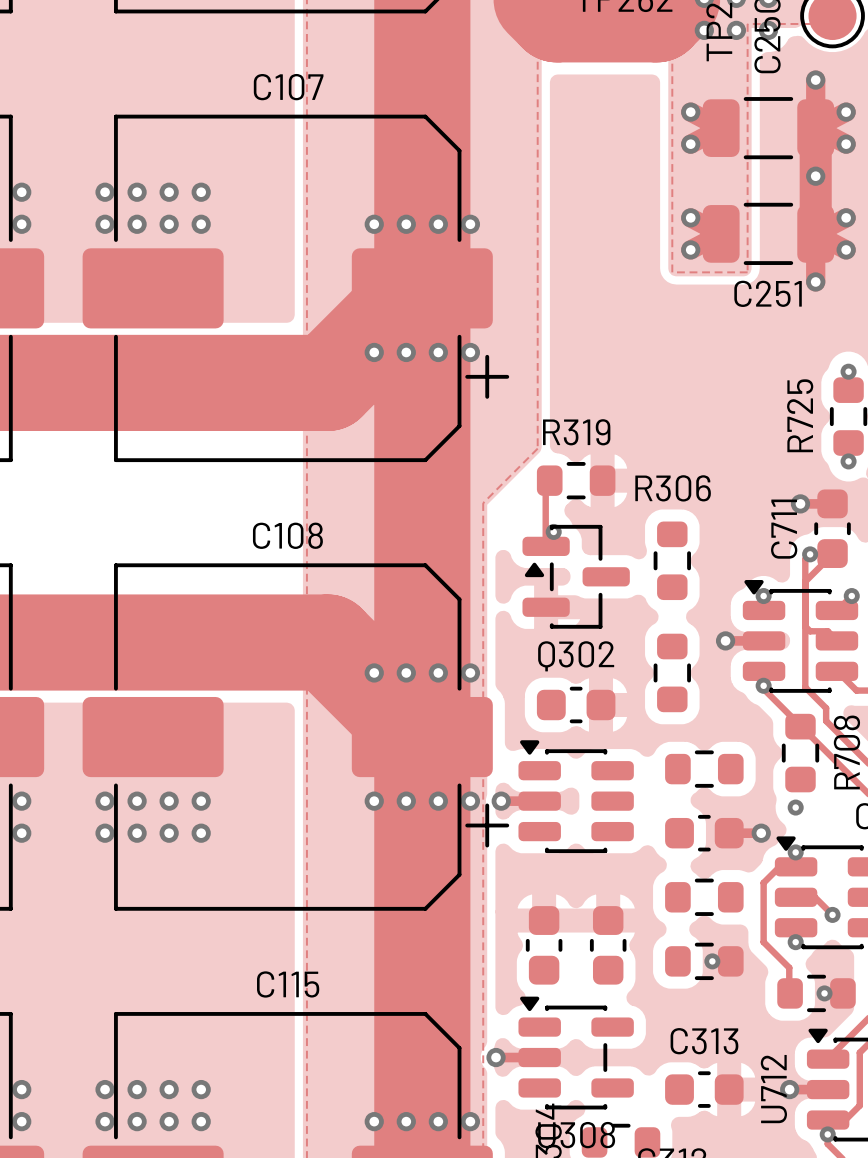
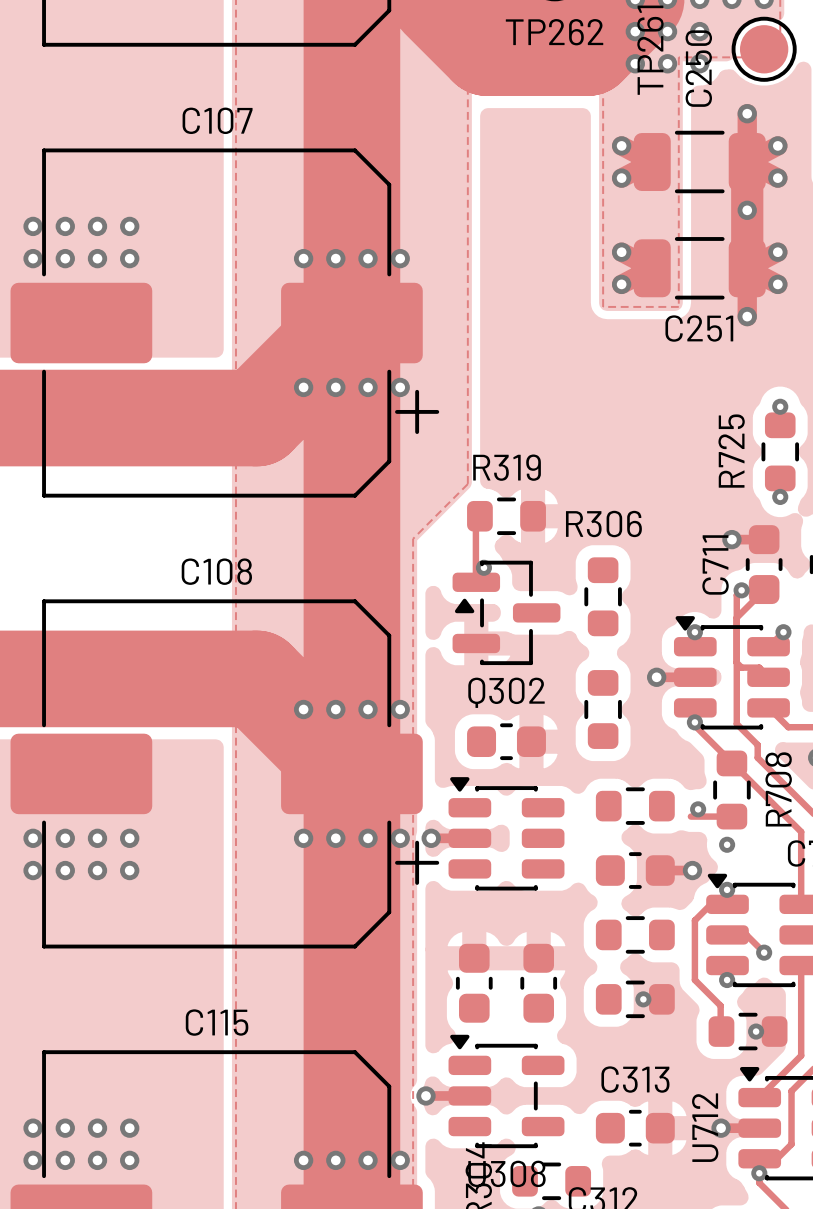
via: none -> (698, 809)
track: none -> (690, 816) (731, 816)

